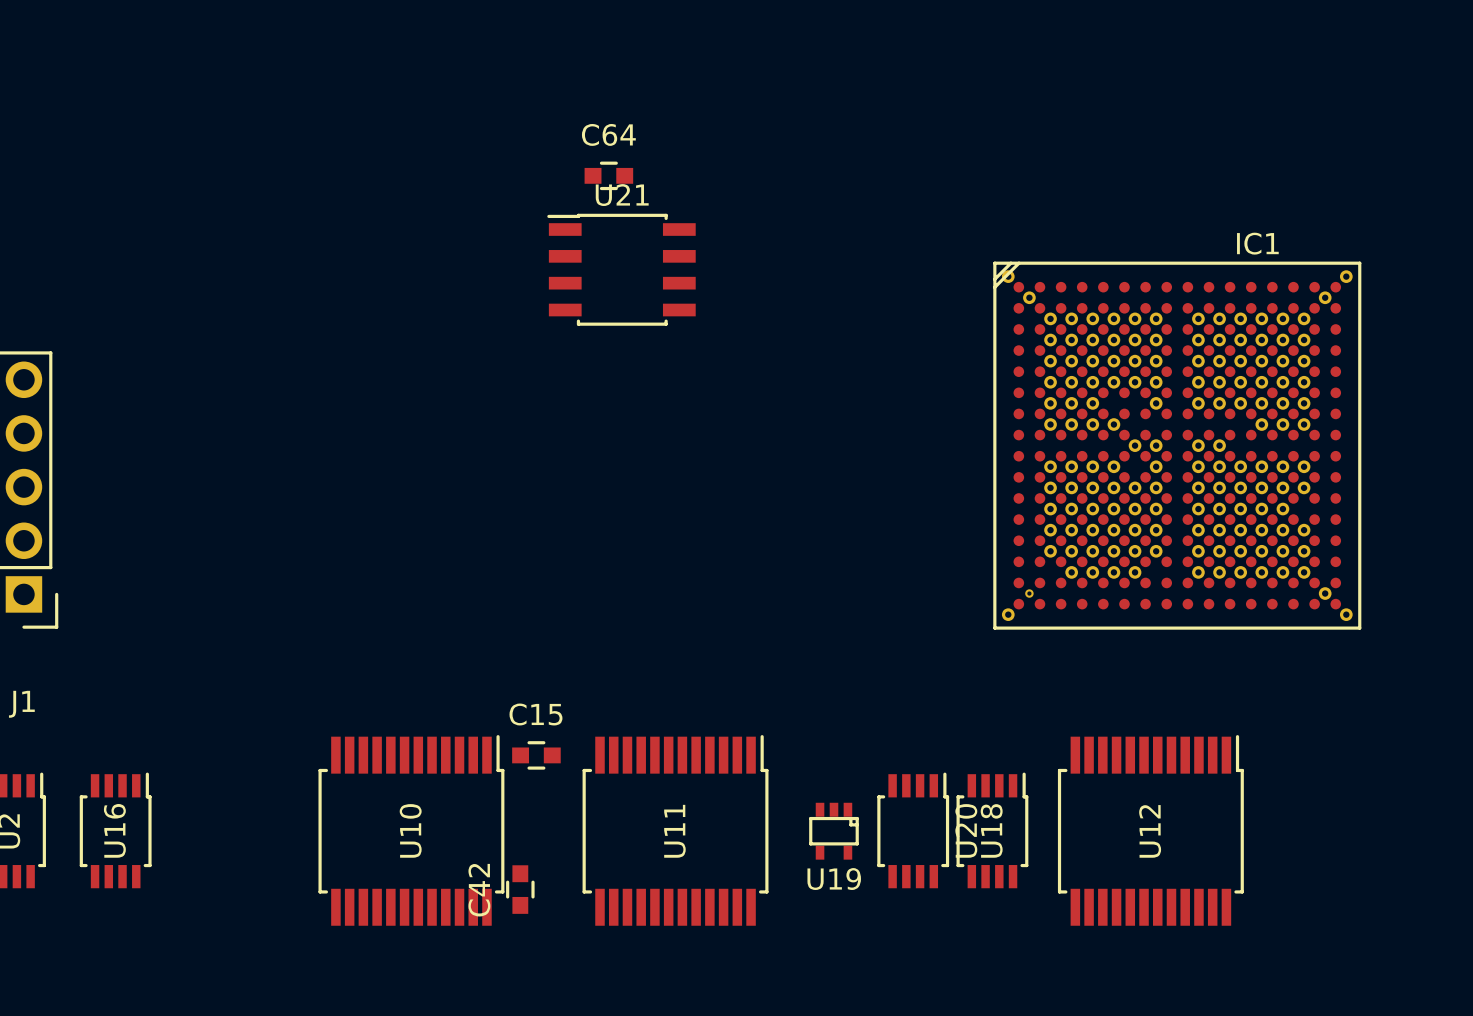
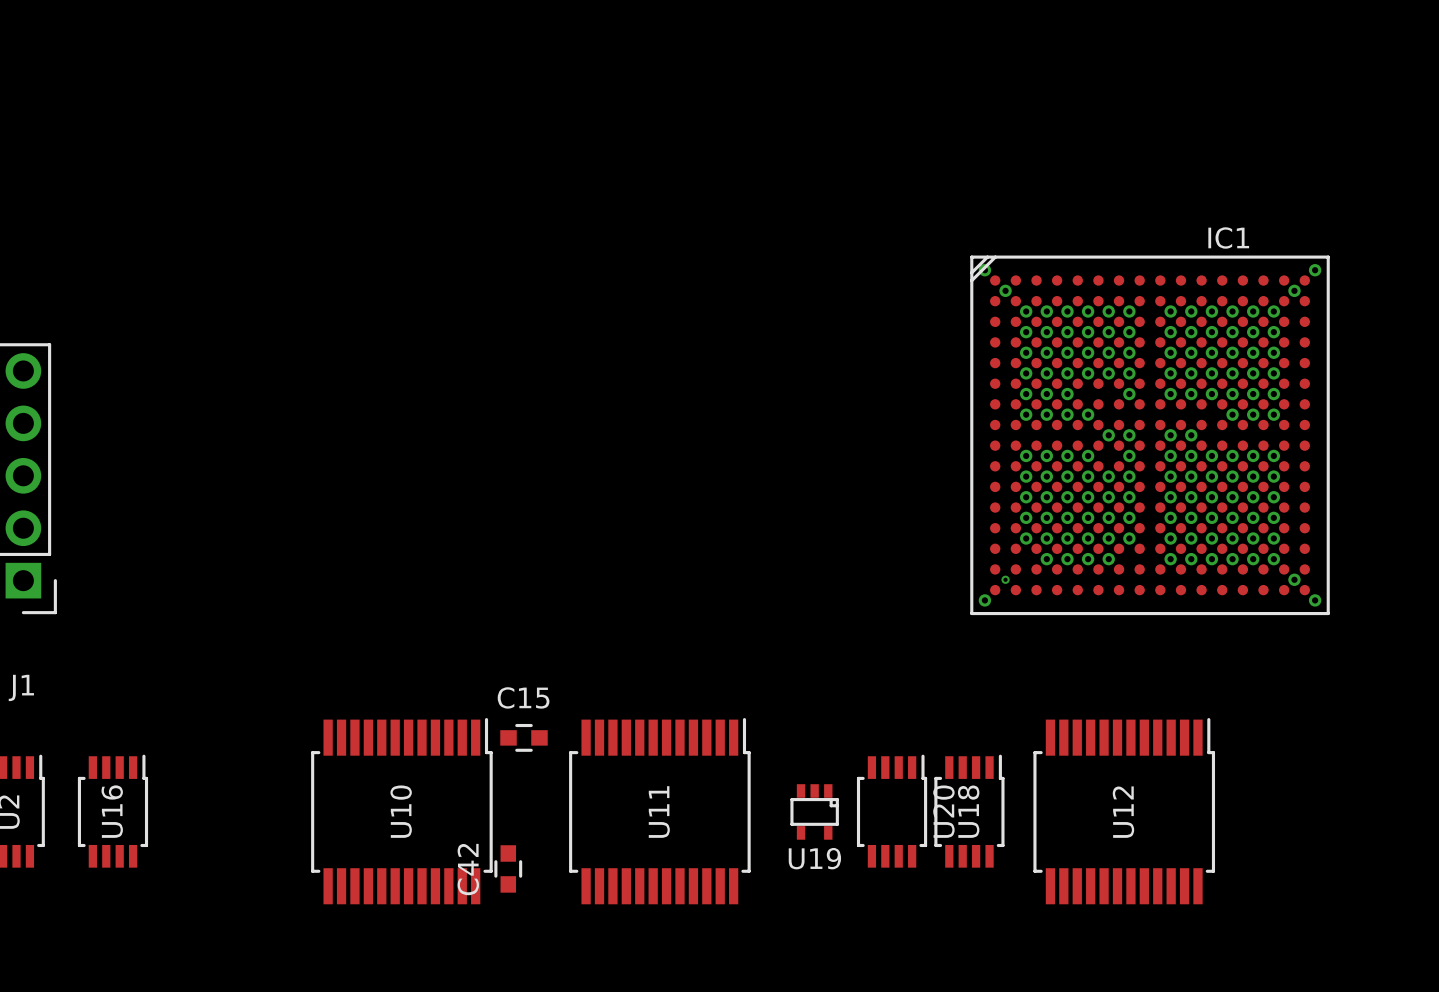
C64: (608, 175) -> none
IC1 footprint: [993, 261, 1362, 630] -> [970, 255, 1330, 616]
U21: (621, 269) -> none

